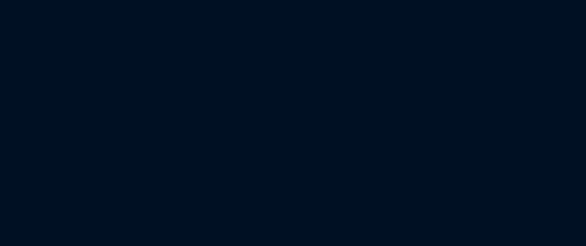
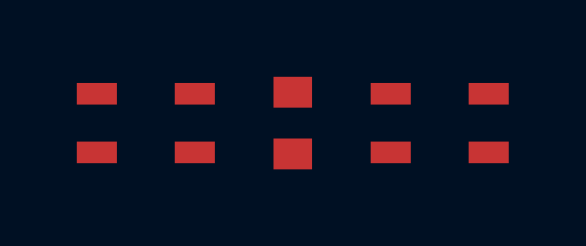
part: none -> (96, 123)
part: none -> (194, 123)
part: none -> (292, 123)
part: none -> (390, 123)
part: none -> (488, 123)

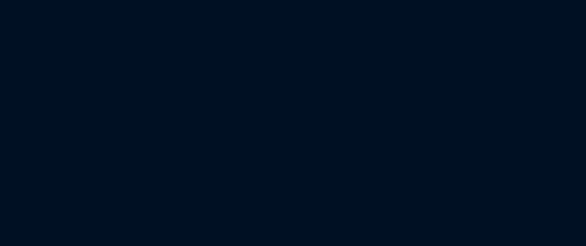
part: (96, 123) -> none
part: (194, 123) -> none
part: (292, 123) -> none
part: (390, 123) -> none
part: (488, 123) -> none

